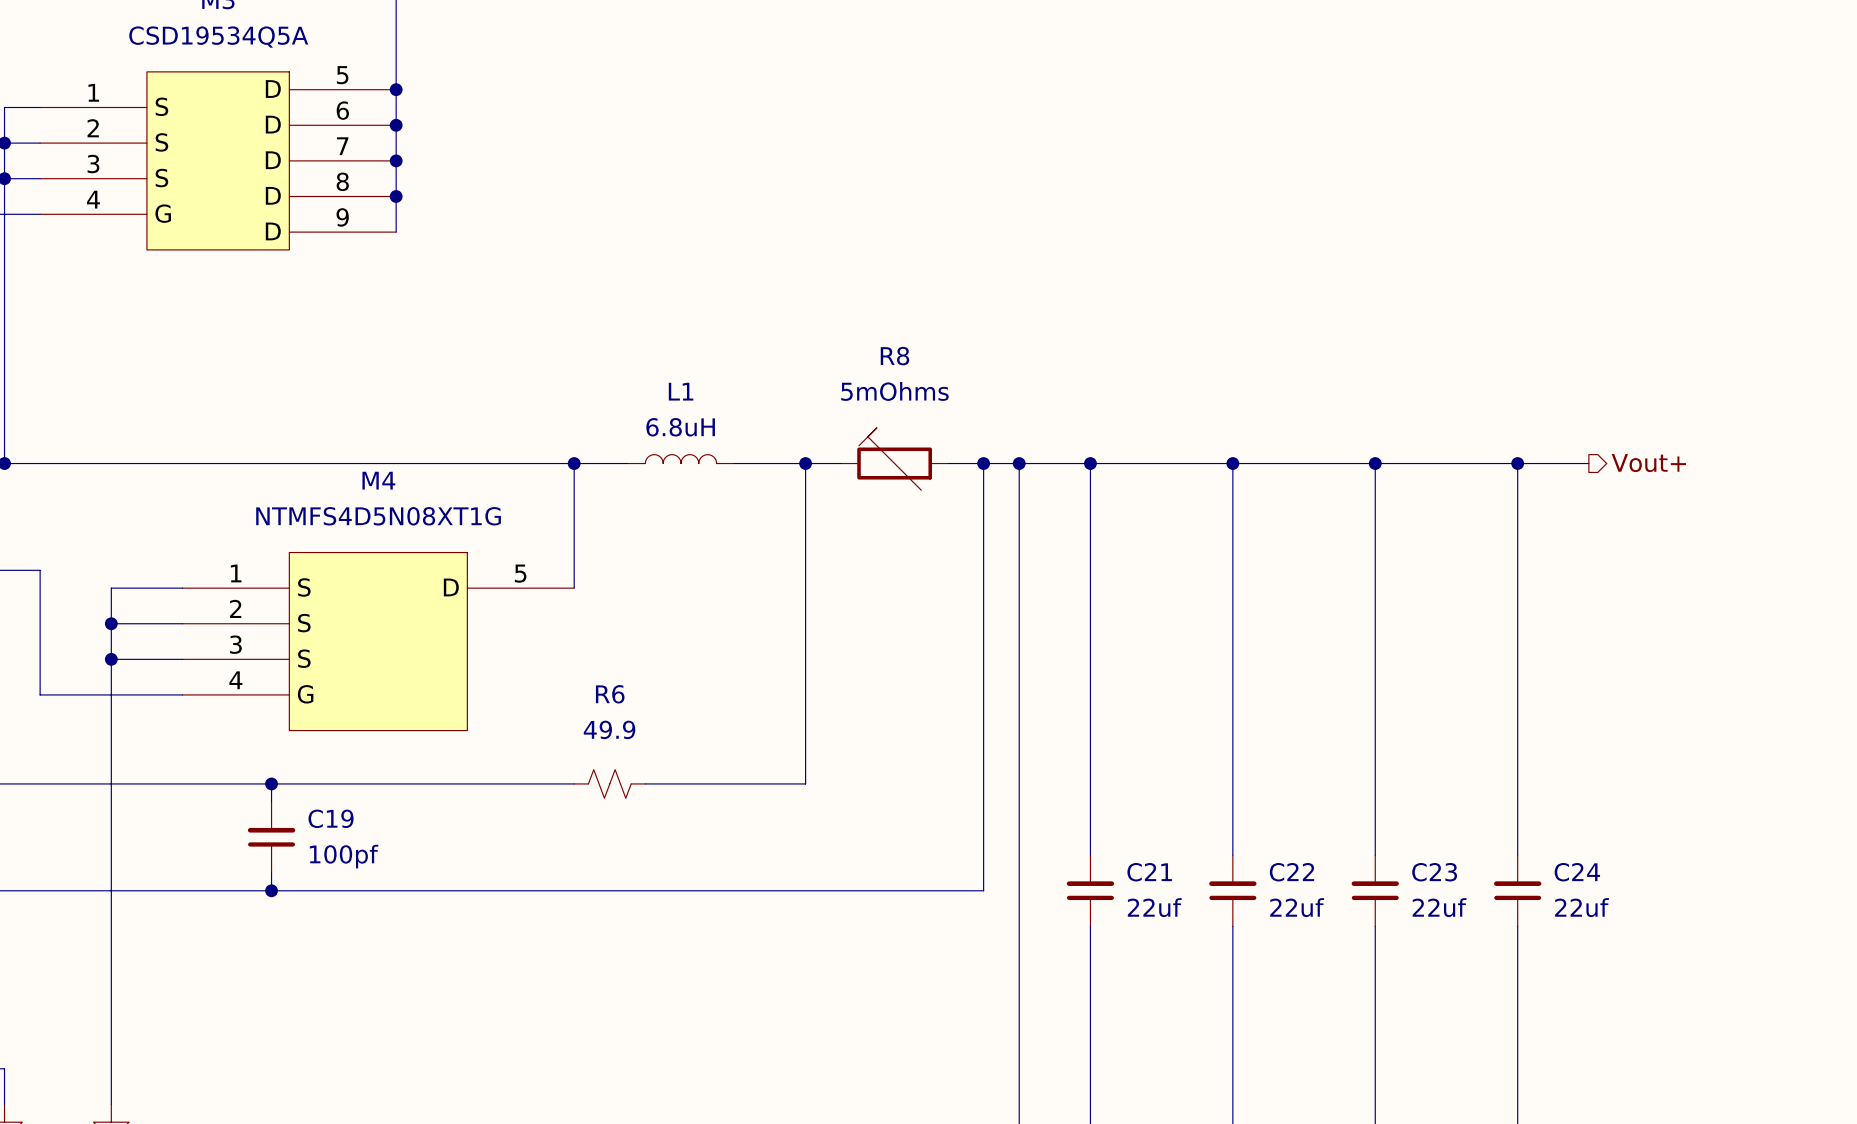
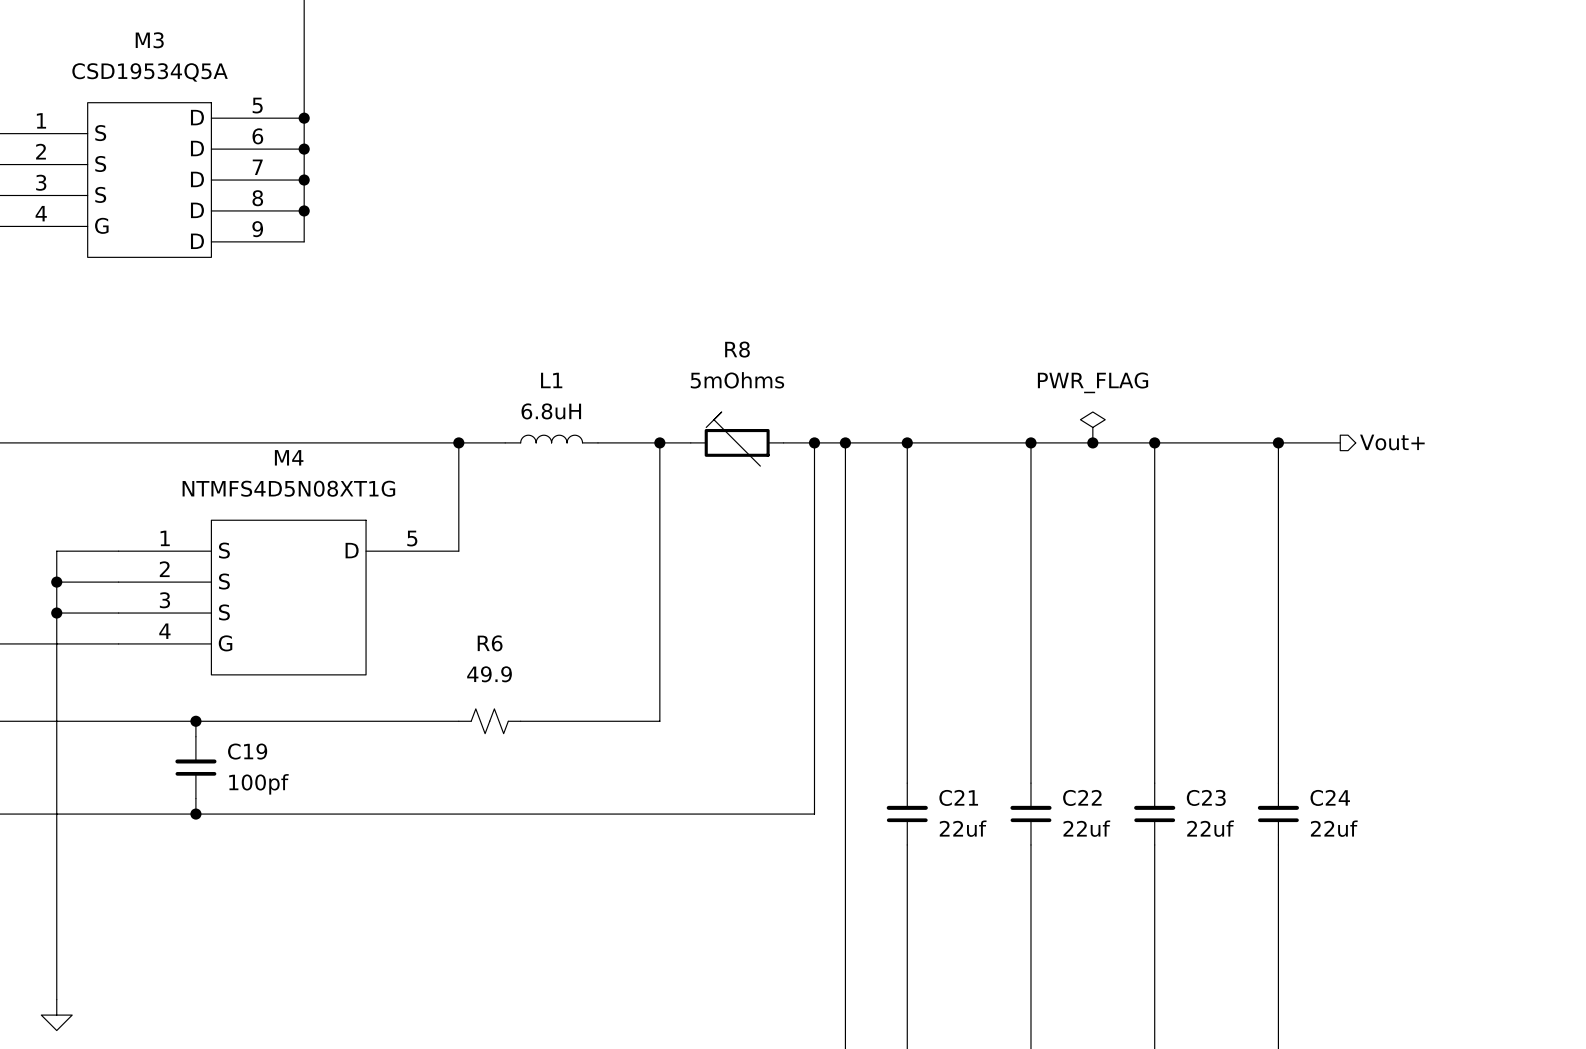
power symbol: none -> PWR_FLAG (1092, 427)
junction: none -> (1092, 442)

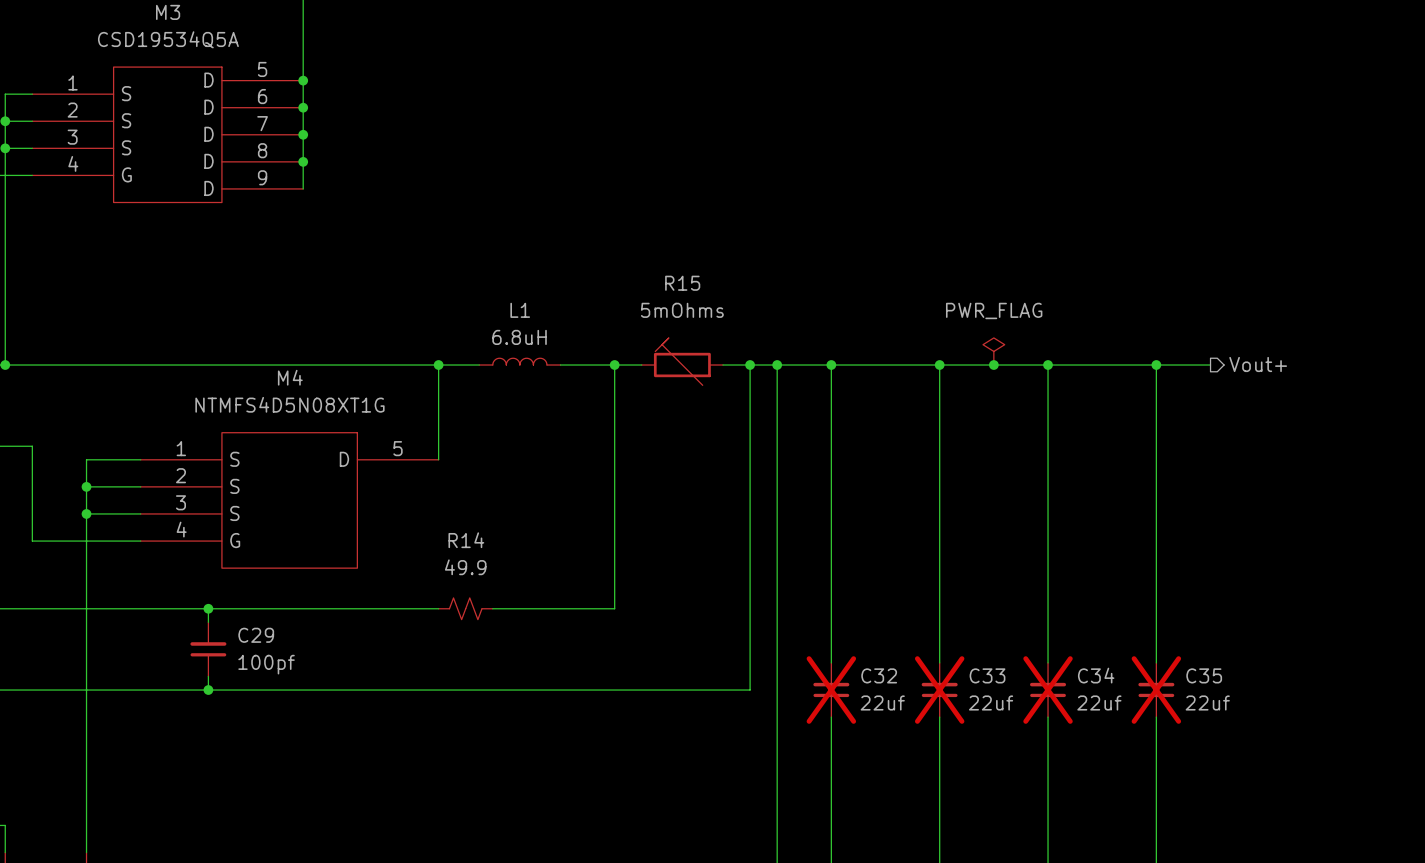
R8 name: R8 (737, 349) -> R15 (682, 283)
R6 name: R6 (490, 643) -> R14 (466, 540)
C19 name: C19 (247, 751) -> C29 (256, 635)
C21 name: C21 (958, 797) -> C32 (879, 675)
C22 name: C22 (1082, 797) -> C33 (987, 675)
C23 name: C23 (1206, 797) -> C34 (1096, 675)
C24 name: C24 (1330, 797) -> C35 (1204, 675)
C21 do-not-place cross: none -> (831, 690)
C22 do-not-place cross: none -> (939, 690)
C23 do-not-place cross: none -> (1048, 690)
C24 do-not-place cross: none -> (1156, 690)

